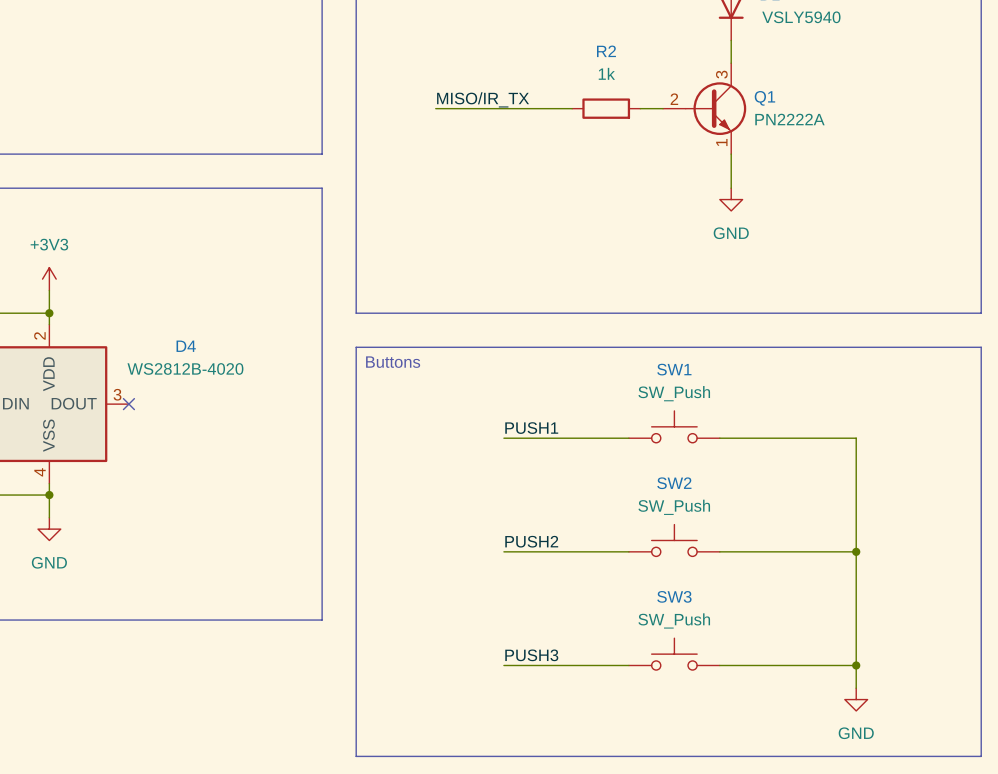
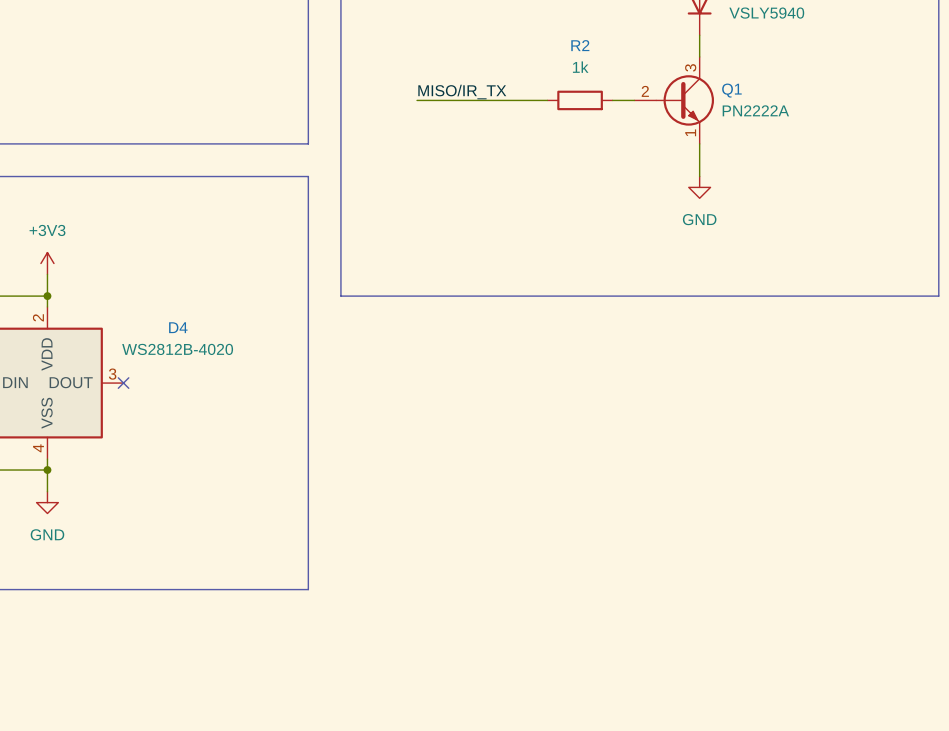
line: (356, 347) (981, 347) (981, 756) (356, 756) (356, 347) -> none
text: Buttons (393, 362) -> none
SW1: SW_Push (674, 426) -> none
label: PUSH1 (531, 428) -> none
wire: (503, 438) (628, 438) -> none
wire: (719, 438) (856, 438) (856, 688) -> none
SW2: SW_Push (674, 540) -> none
label: PUSH2 (531, 541) -> none
wire: (503, 551) (628, 551) -> none
wire: (719, 551) (856, 551) -> none
junction: (856, 551) -> none
SW3: SW_Push (674, 654) -> none
label: PUSH3 (531, 655) -> none
wire: (503, 665) (628, 665) -> none
wire: (719, 665) (856, 665) -> none
junction: (856, 665) -> none
power symbol: GND (856, 699) -> none

